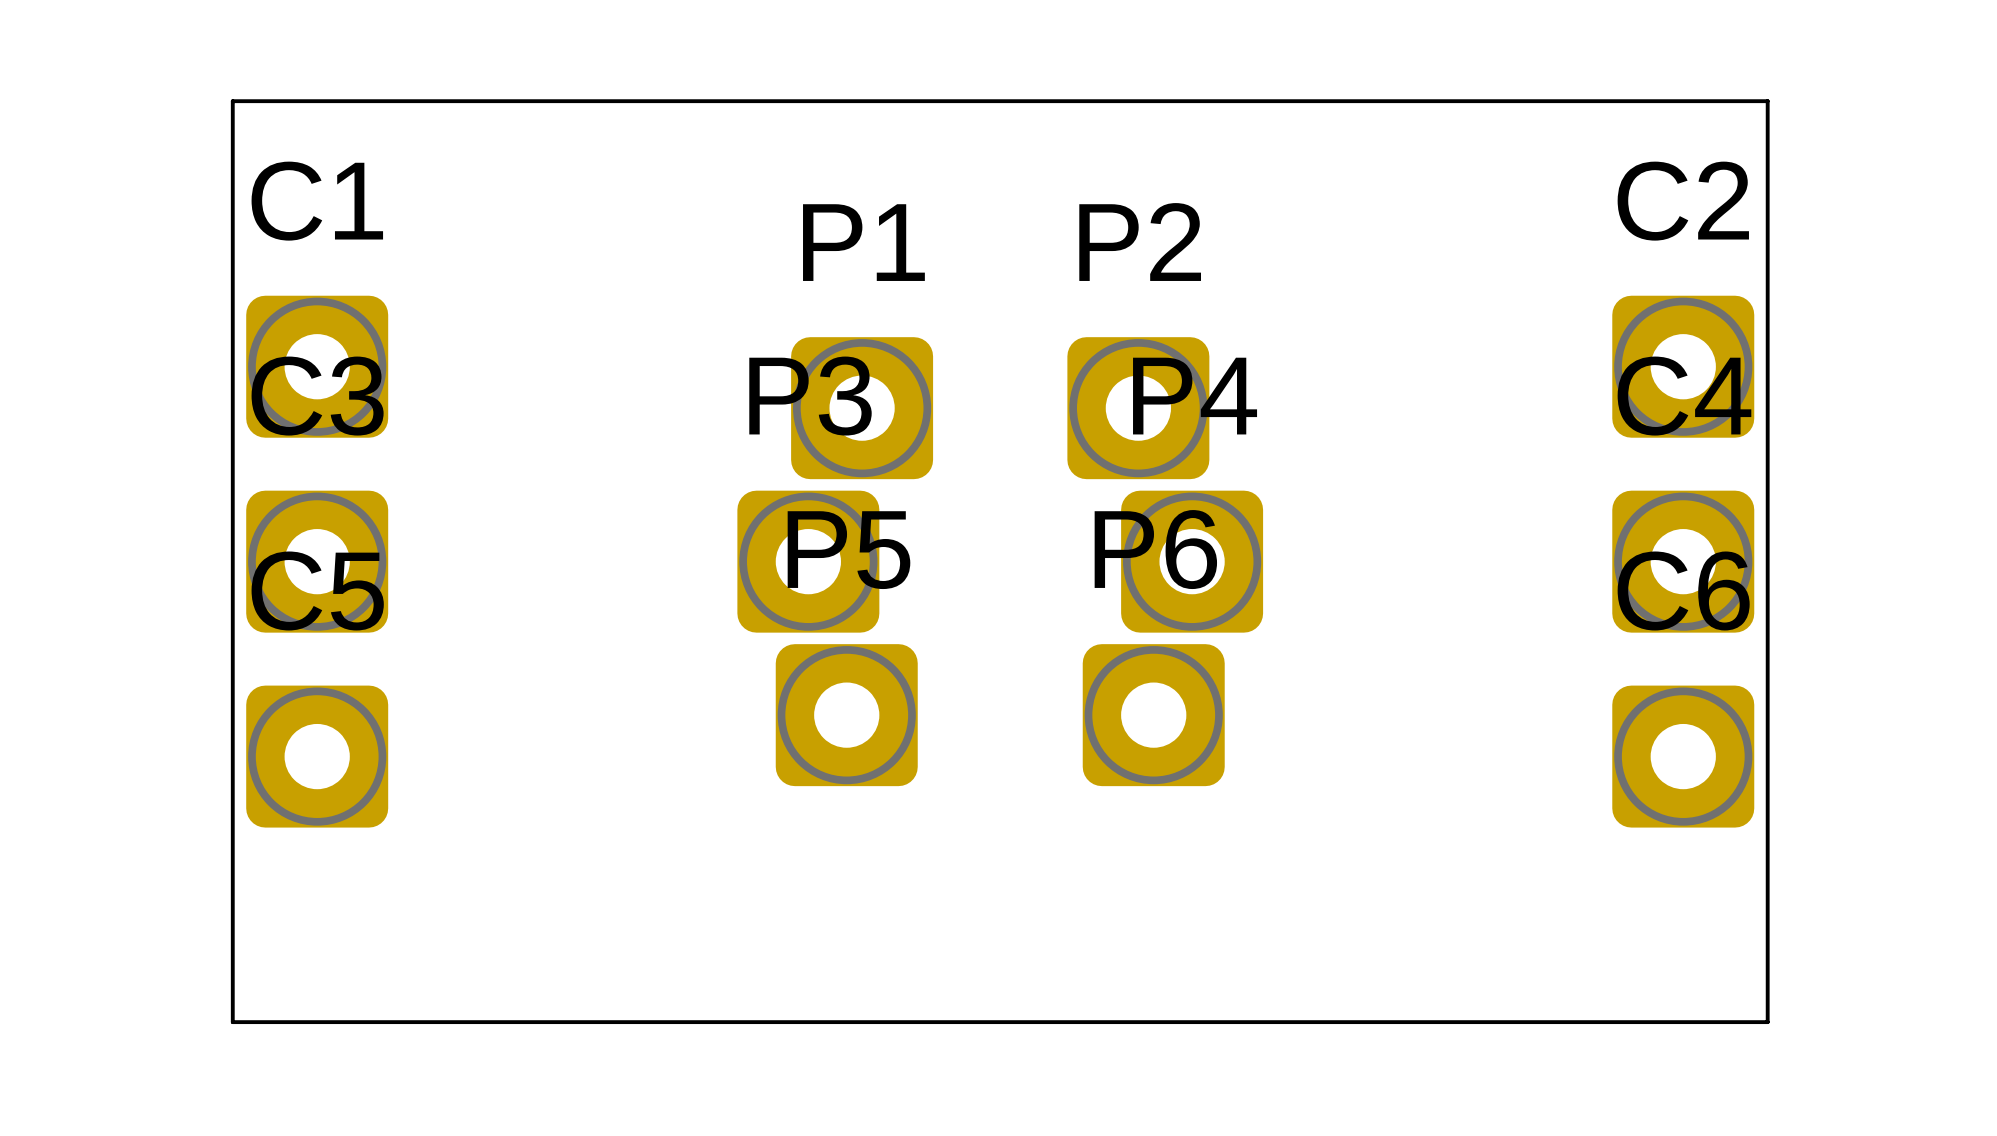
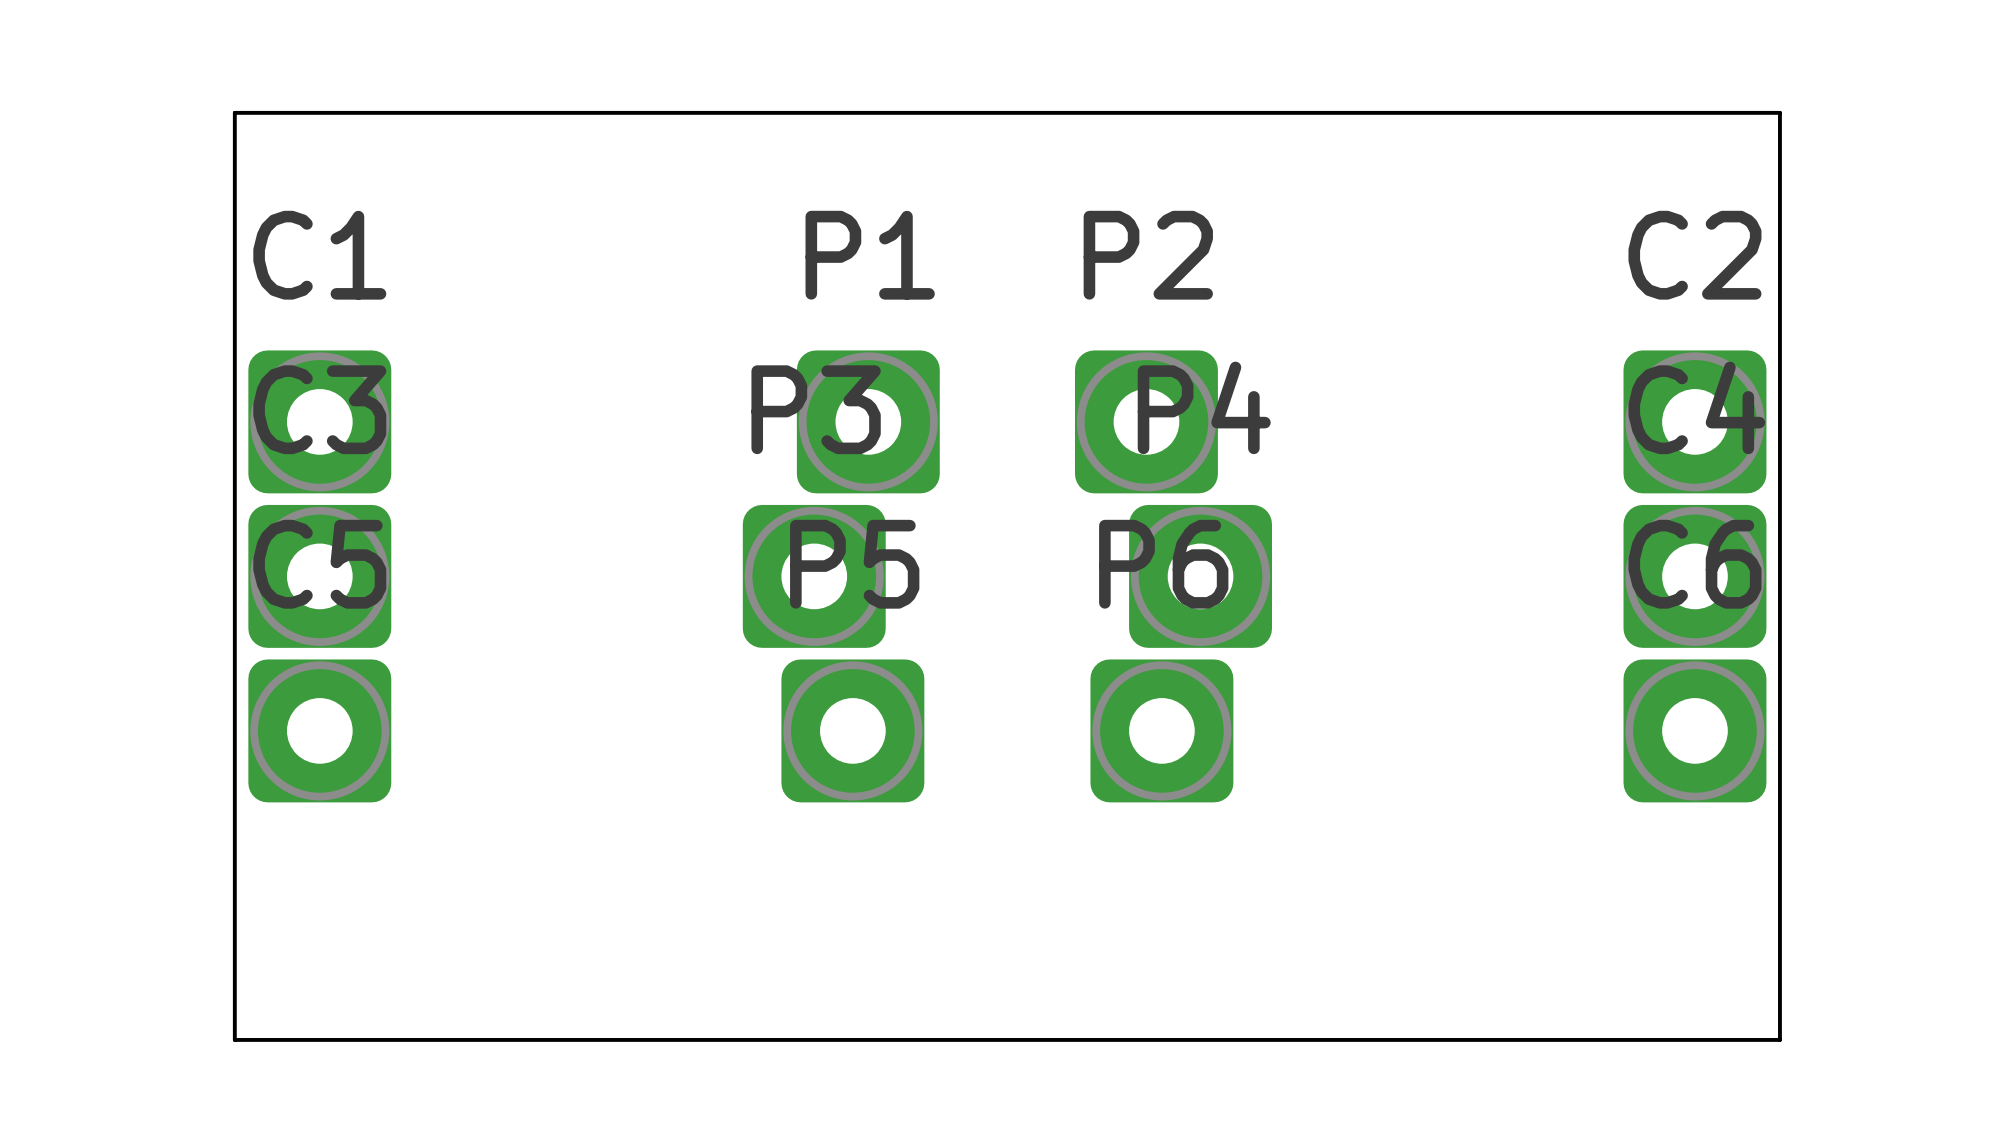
C1 position: (317, 366) -> (319, 421)
C2 position: (1683, 366) -> (1694, 421)
C5 position: (317, 756) -> (319, 730)
C6 position: (1683, 756) -> (1694, 730)

